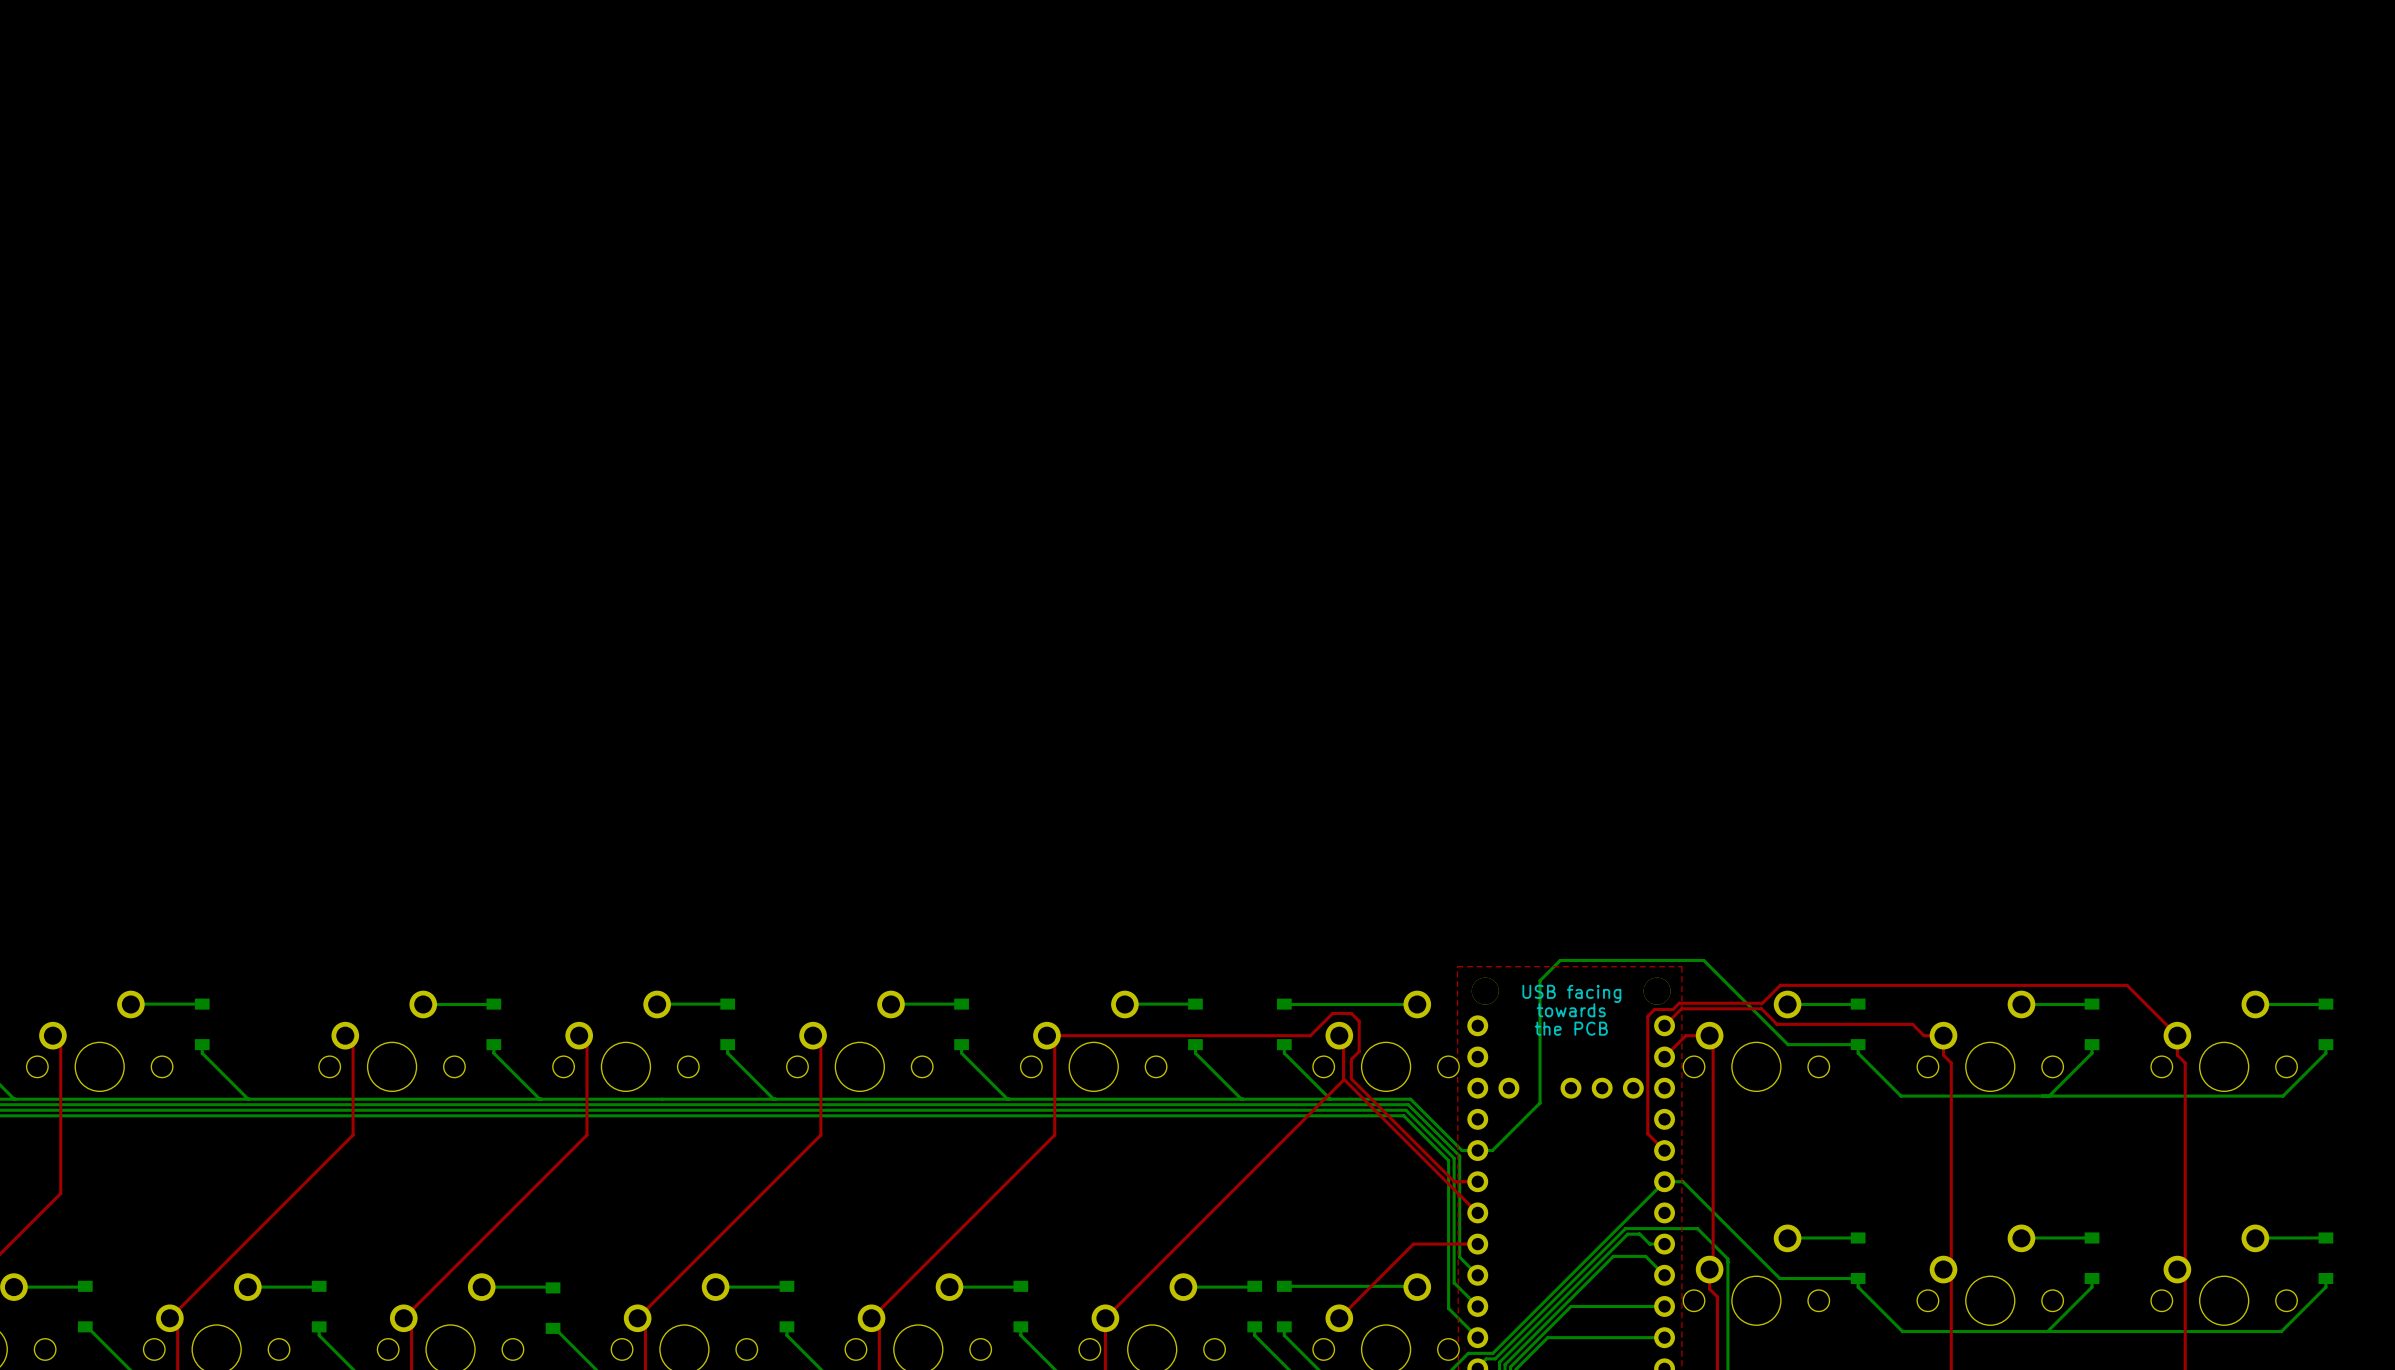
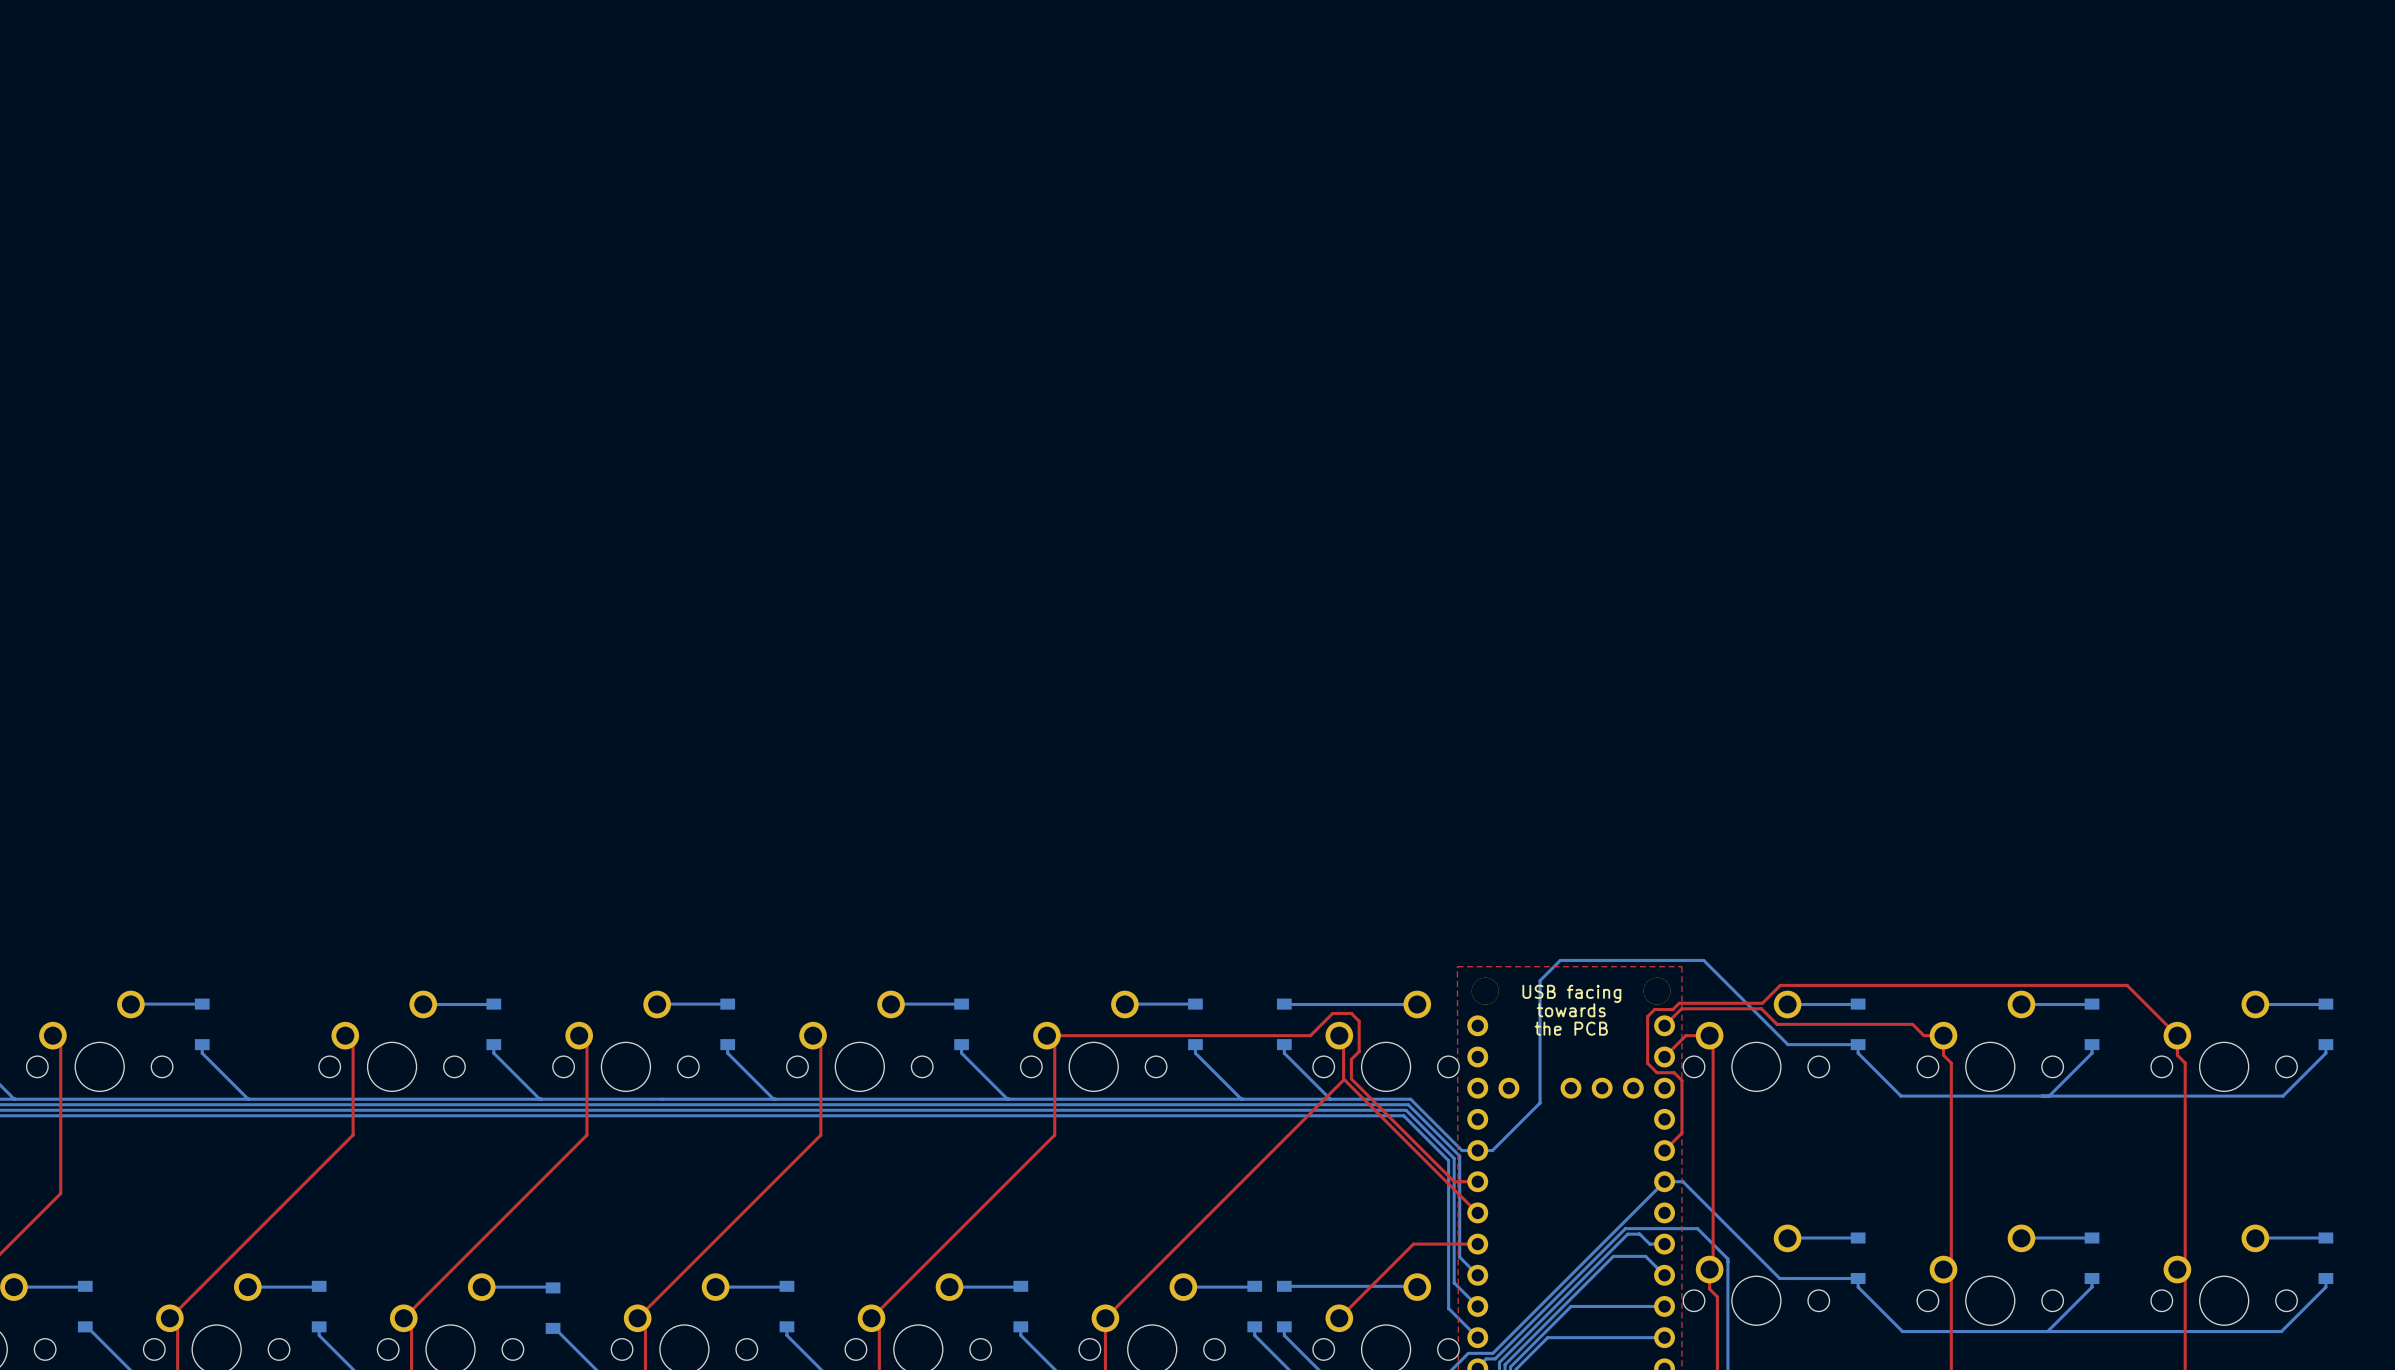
top track: (1647, 1016) (1647, 1133) (1664, 1150) -> (1647, 1016) (1647, 1063) (1657, 1072) (1674, 1072) (1681, 1080) (1681, 1133) (1664, 1150)

